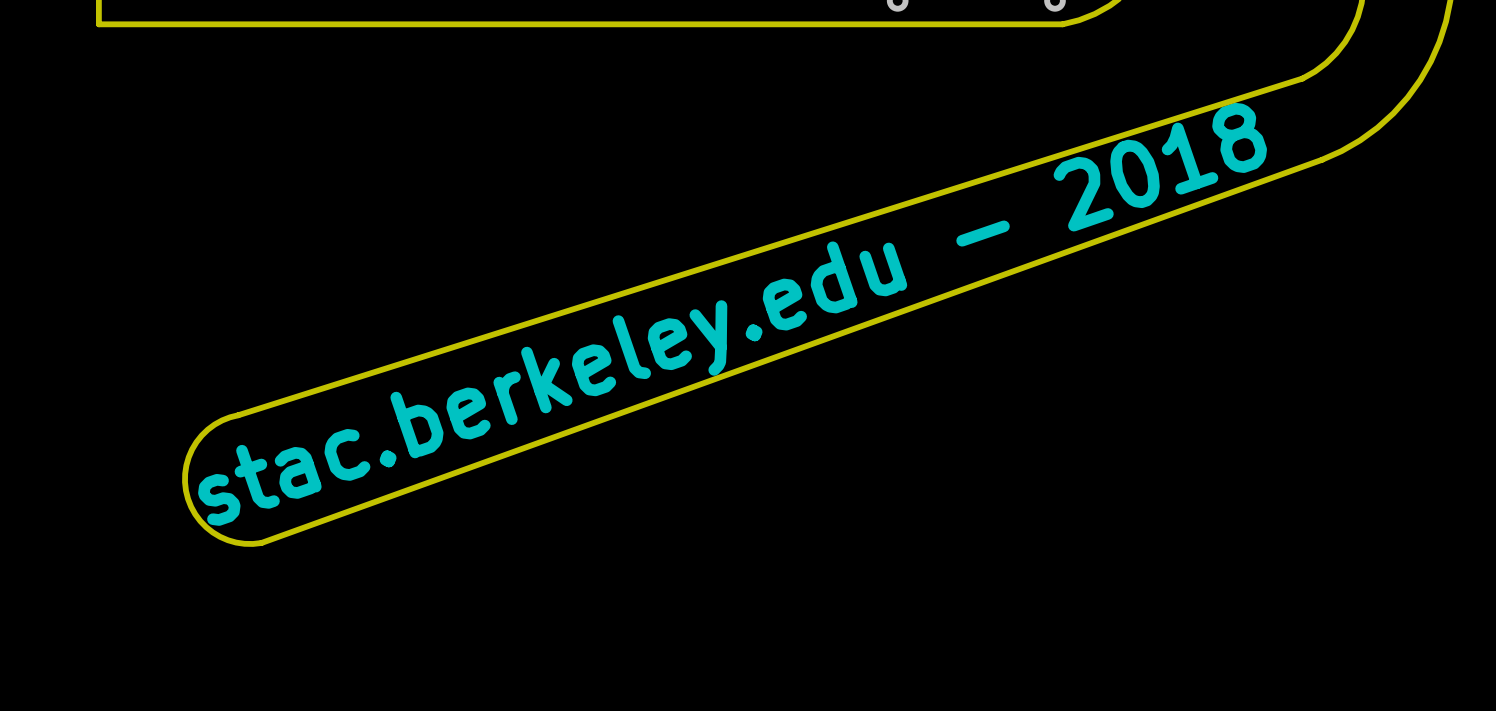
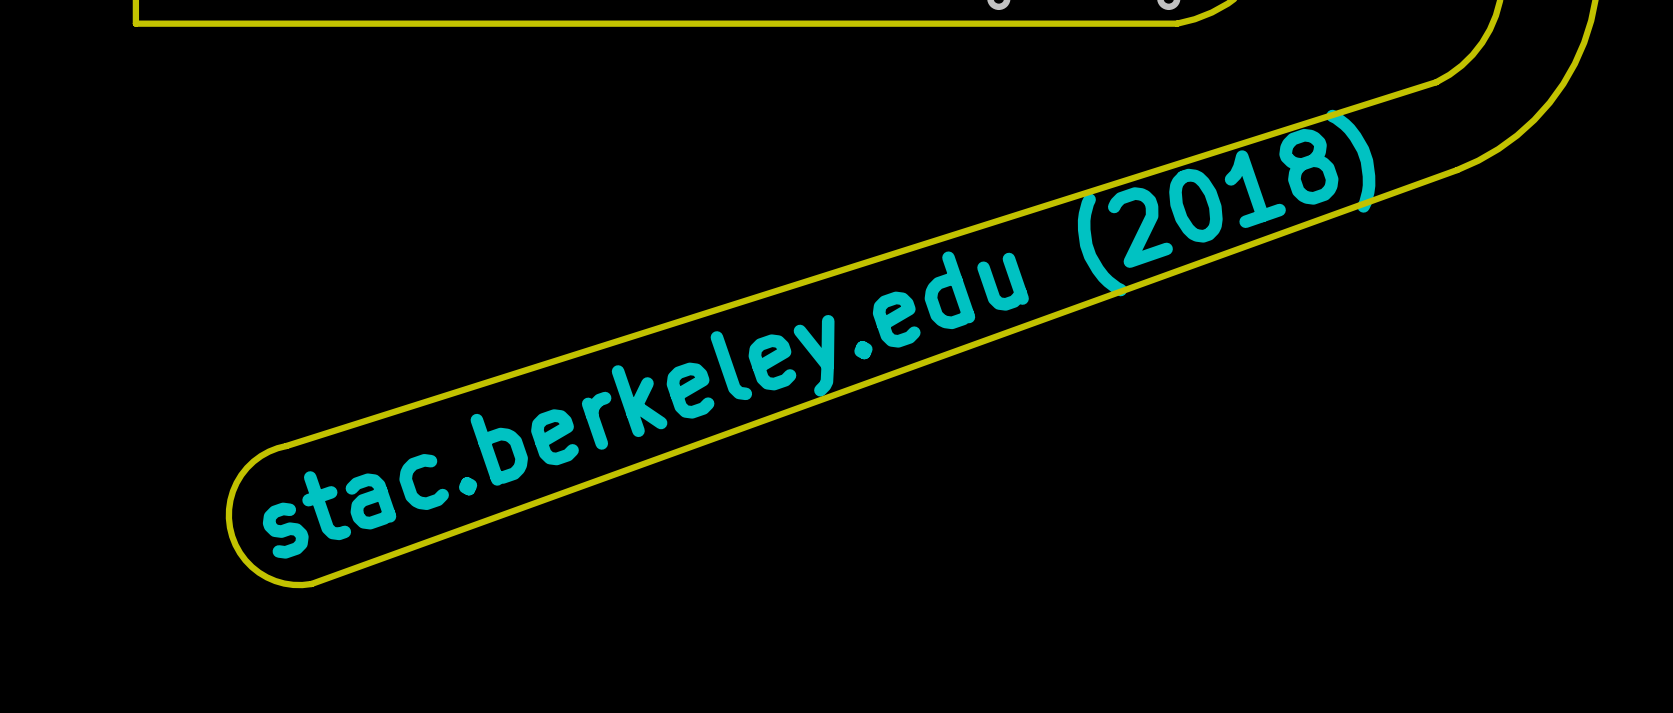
text: stac.berkeley.edu - 2018 (732, 314) -> stac.berkeley.edu (2018) (819, 334)

